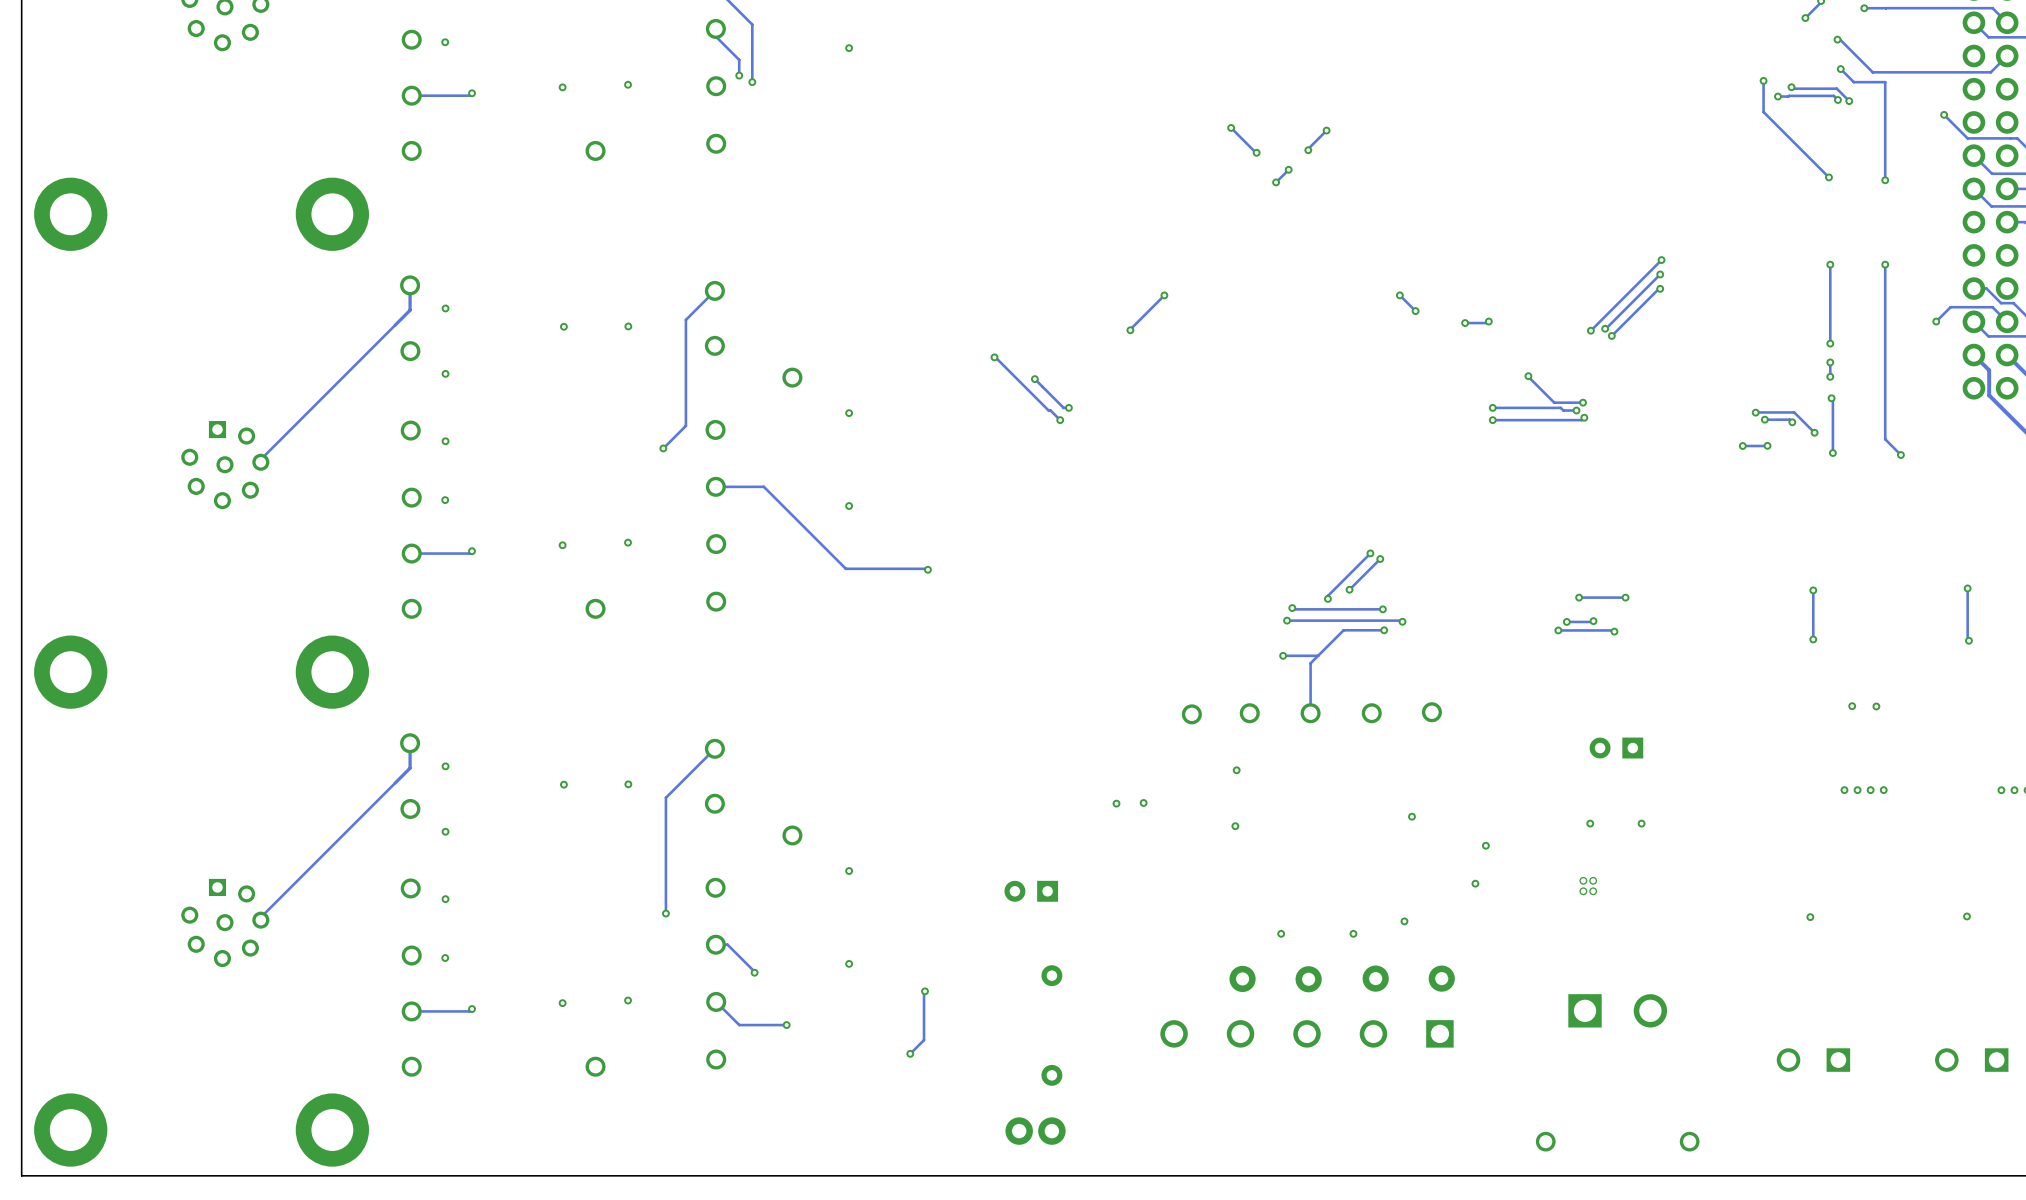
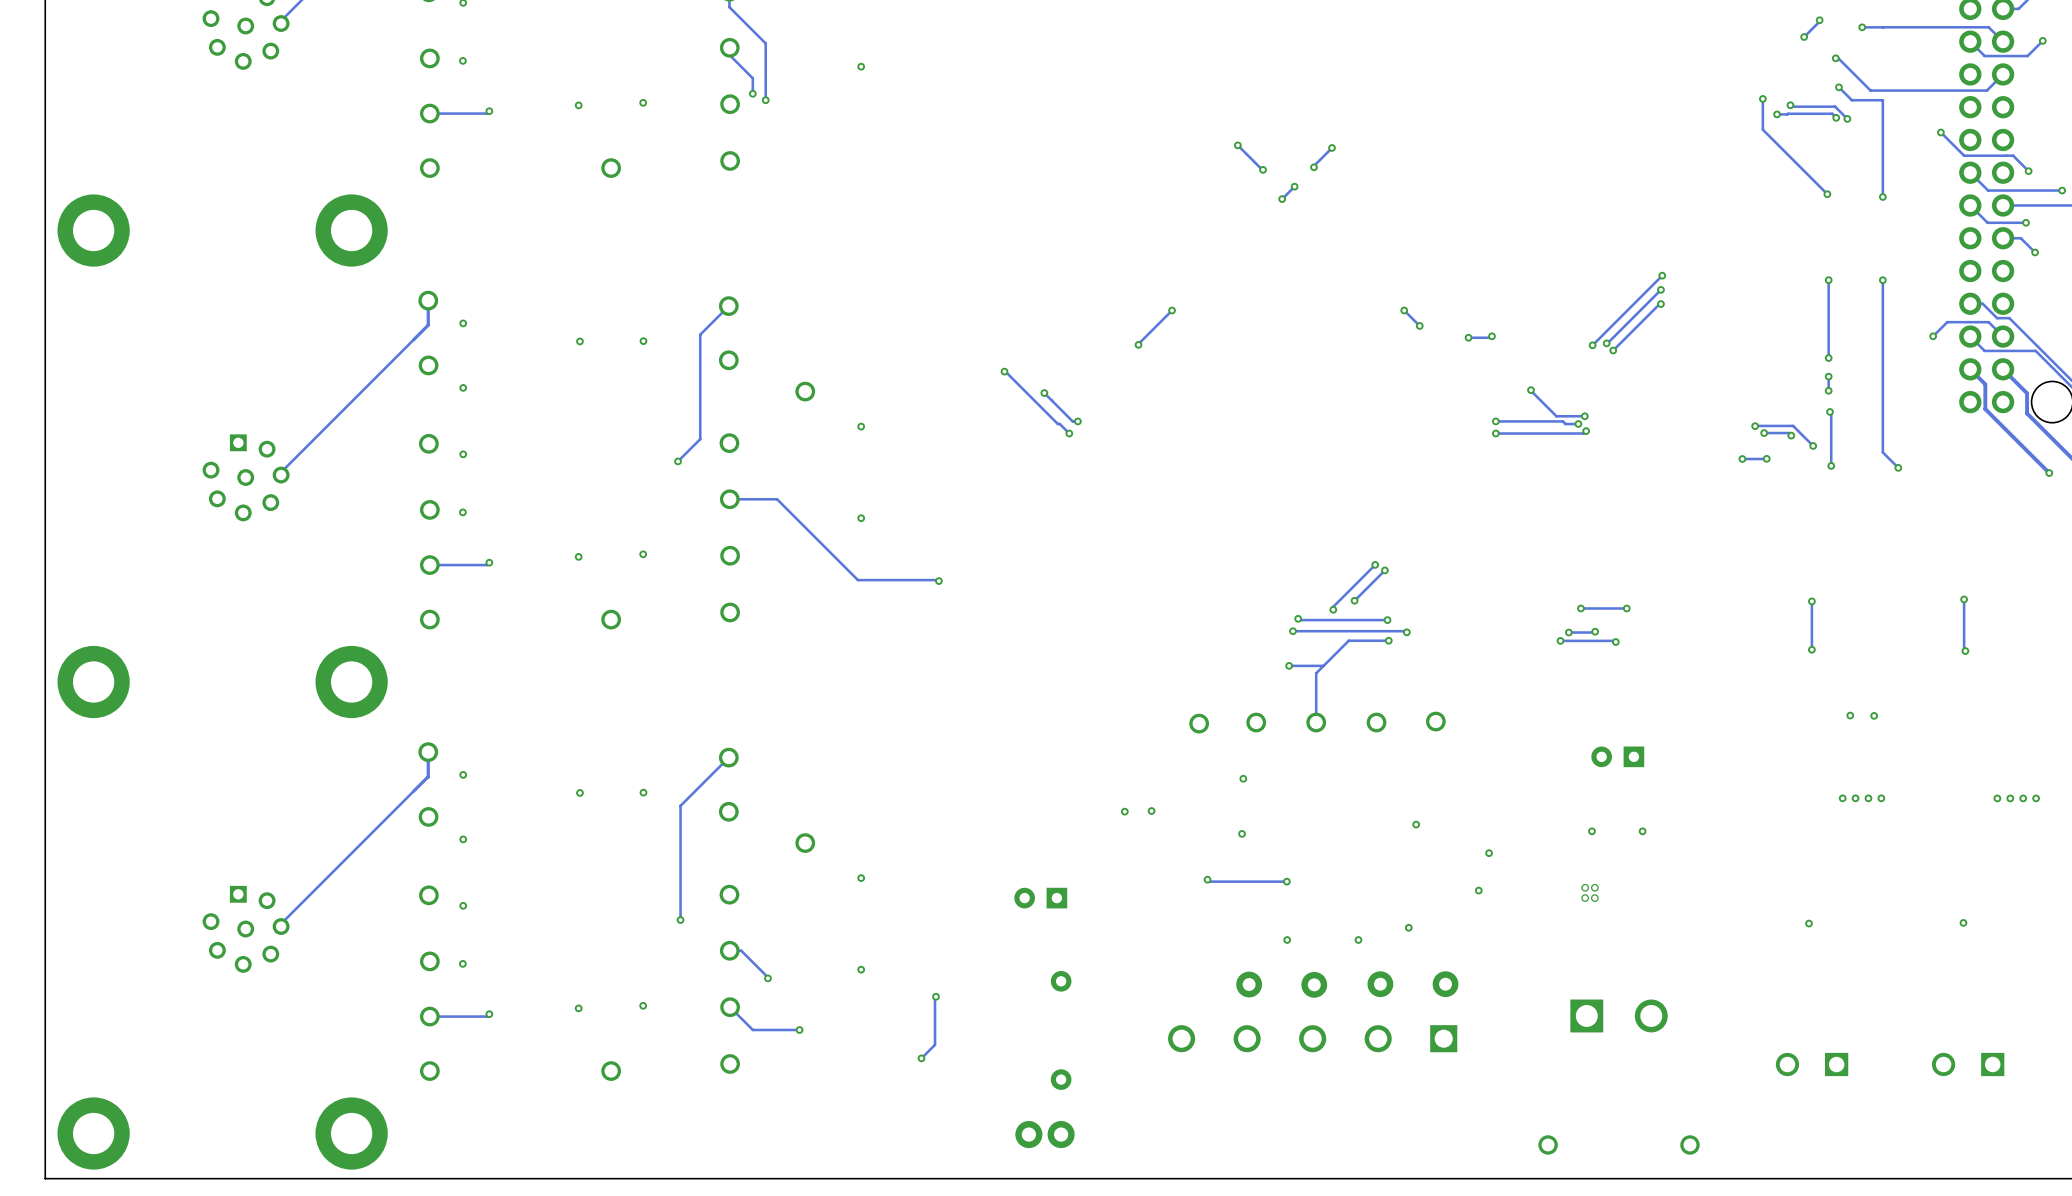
track: none -> (1207, 879) (1209, 881) (1286, 881)
via: none -> (1207, 879)
via: none -> (1286, 881)

